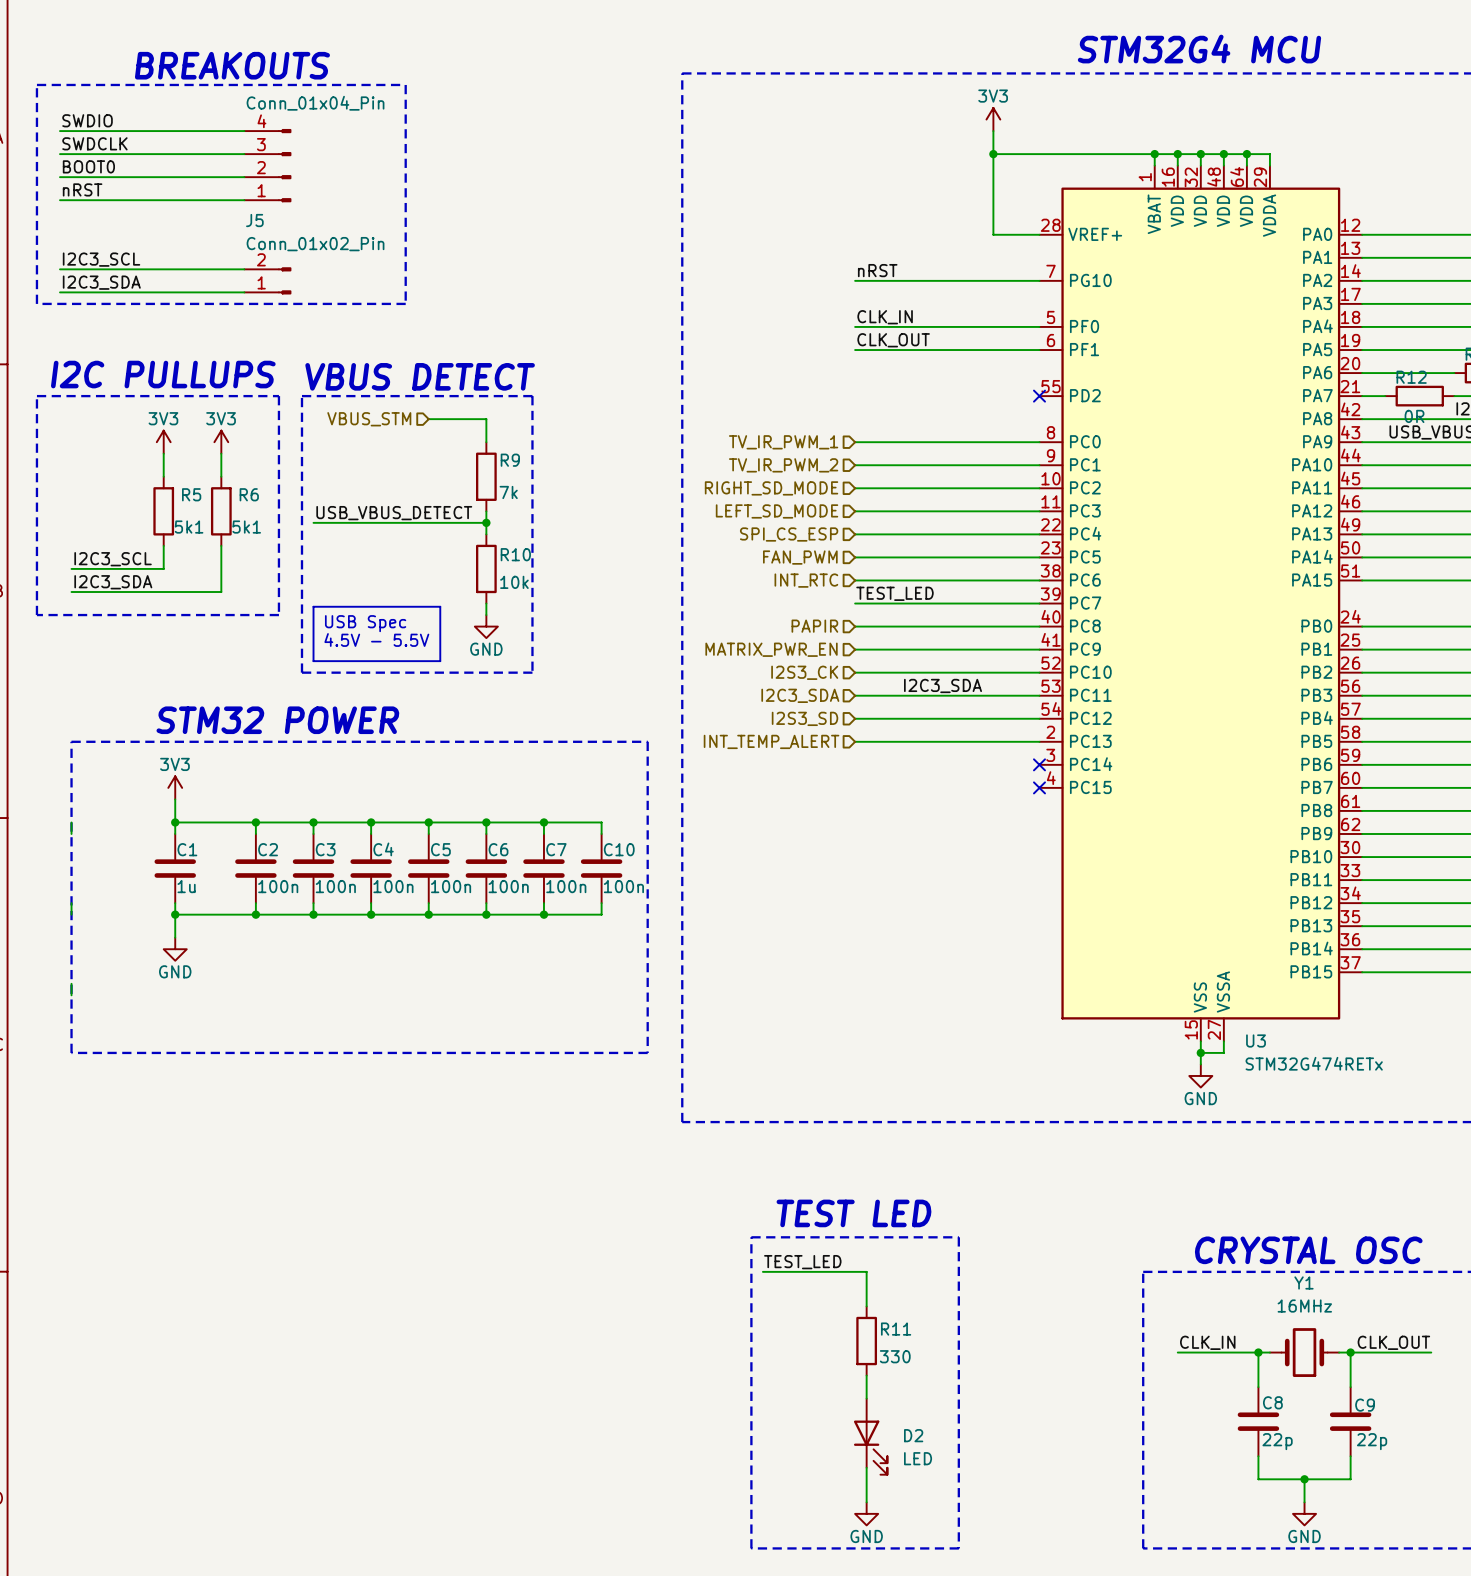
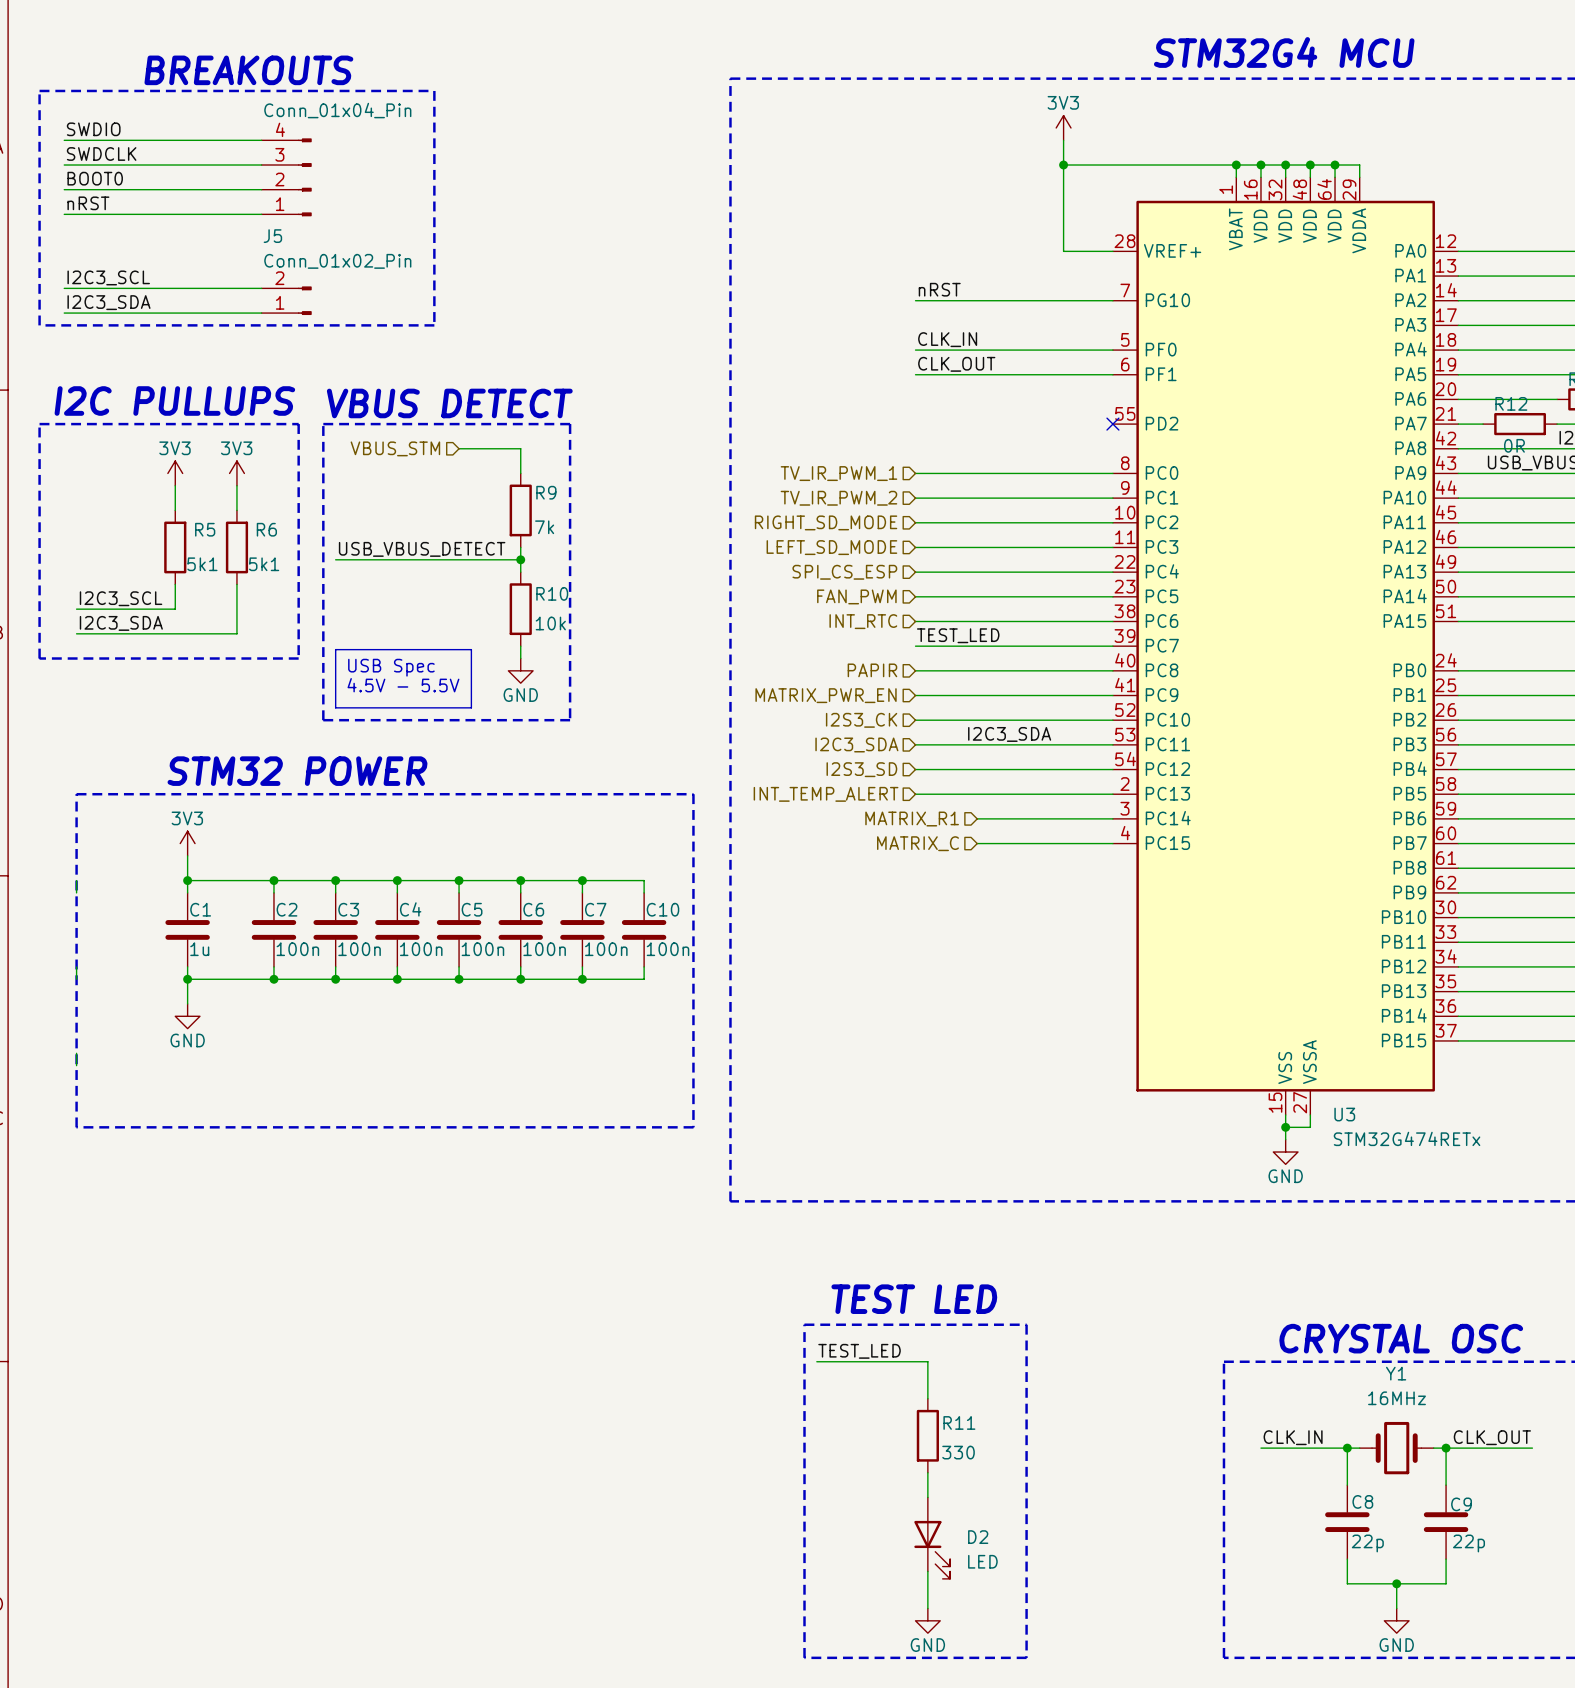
hierarchical label: none -> MATRIX_R1 (912, 819)
wire: none -> (977, 818) (1112, 818)
no-connect mark: (1039, 764) -> none
wire: none -> (977, 843) (1112, 843)
no-connect mark: (1039, 787) -> none
hierarchical label: none -> MATRIX_C (917, 843)

